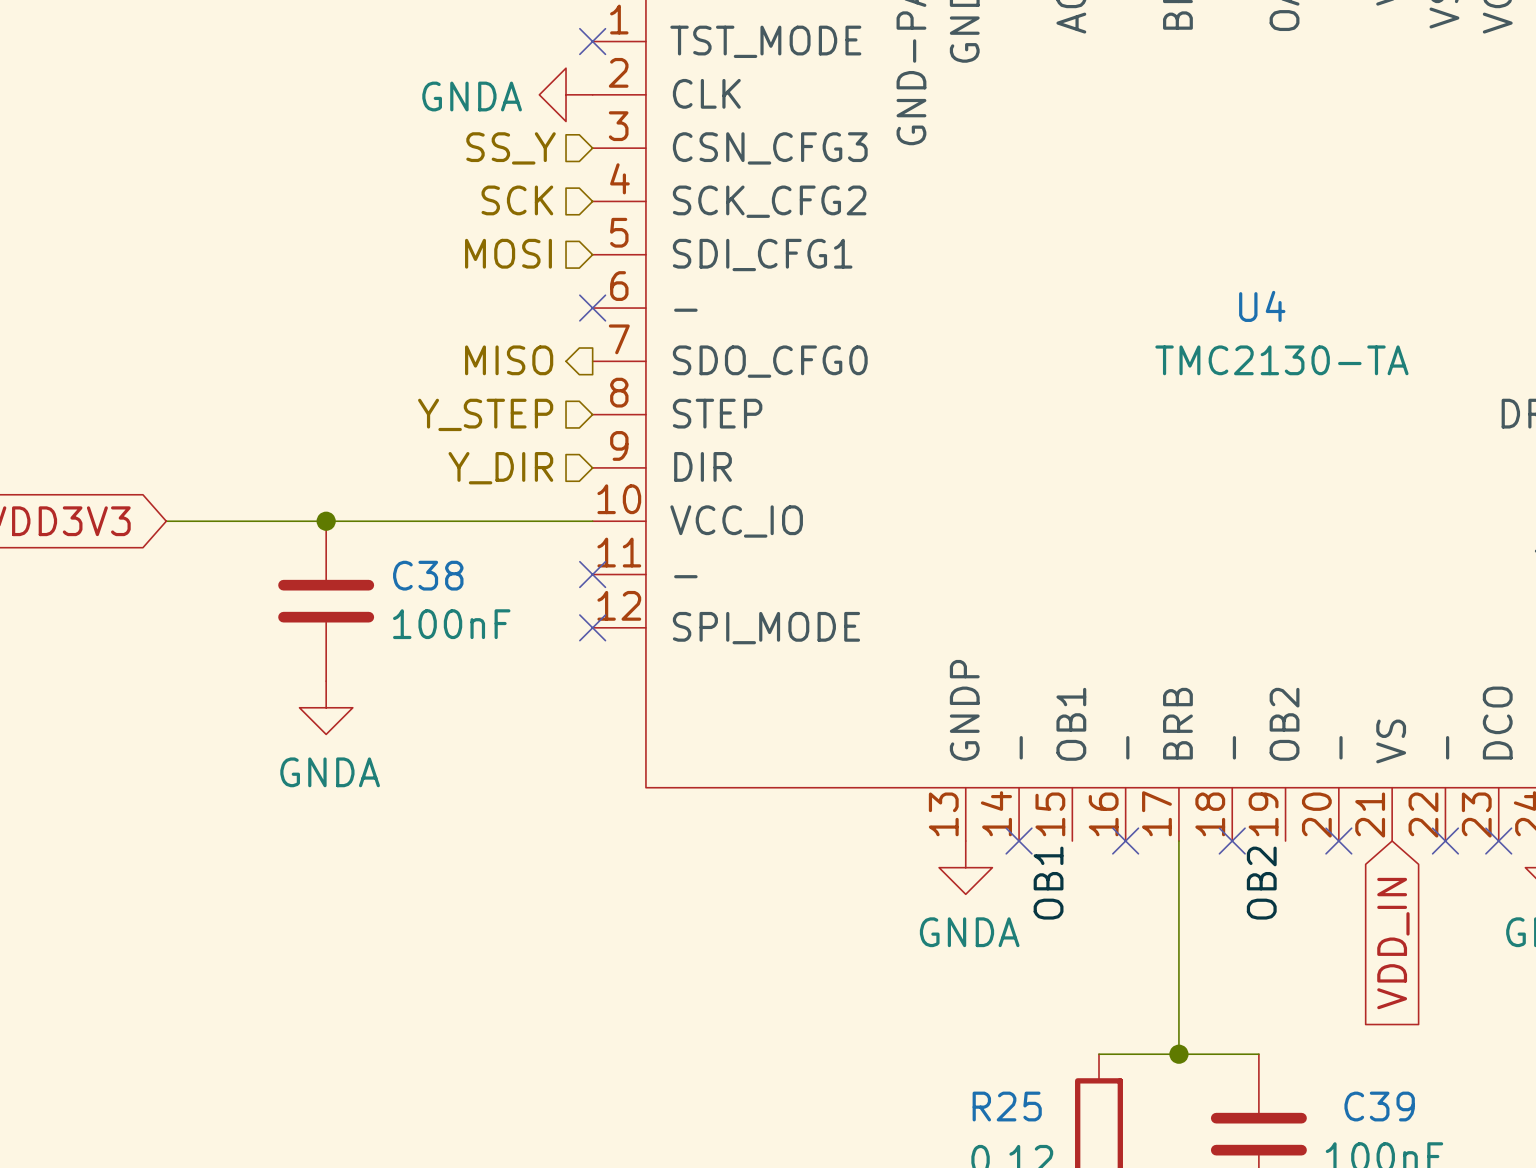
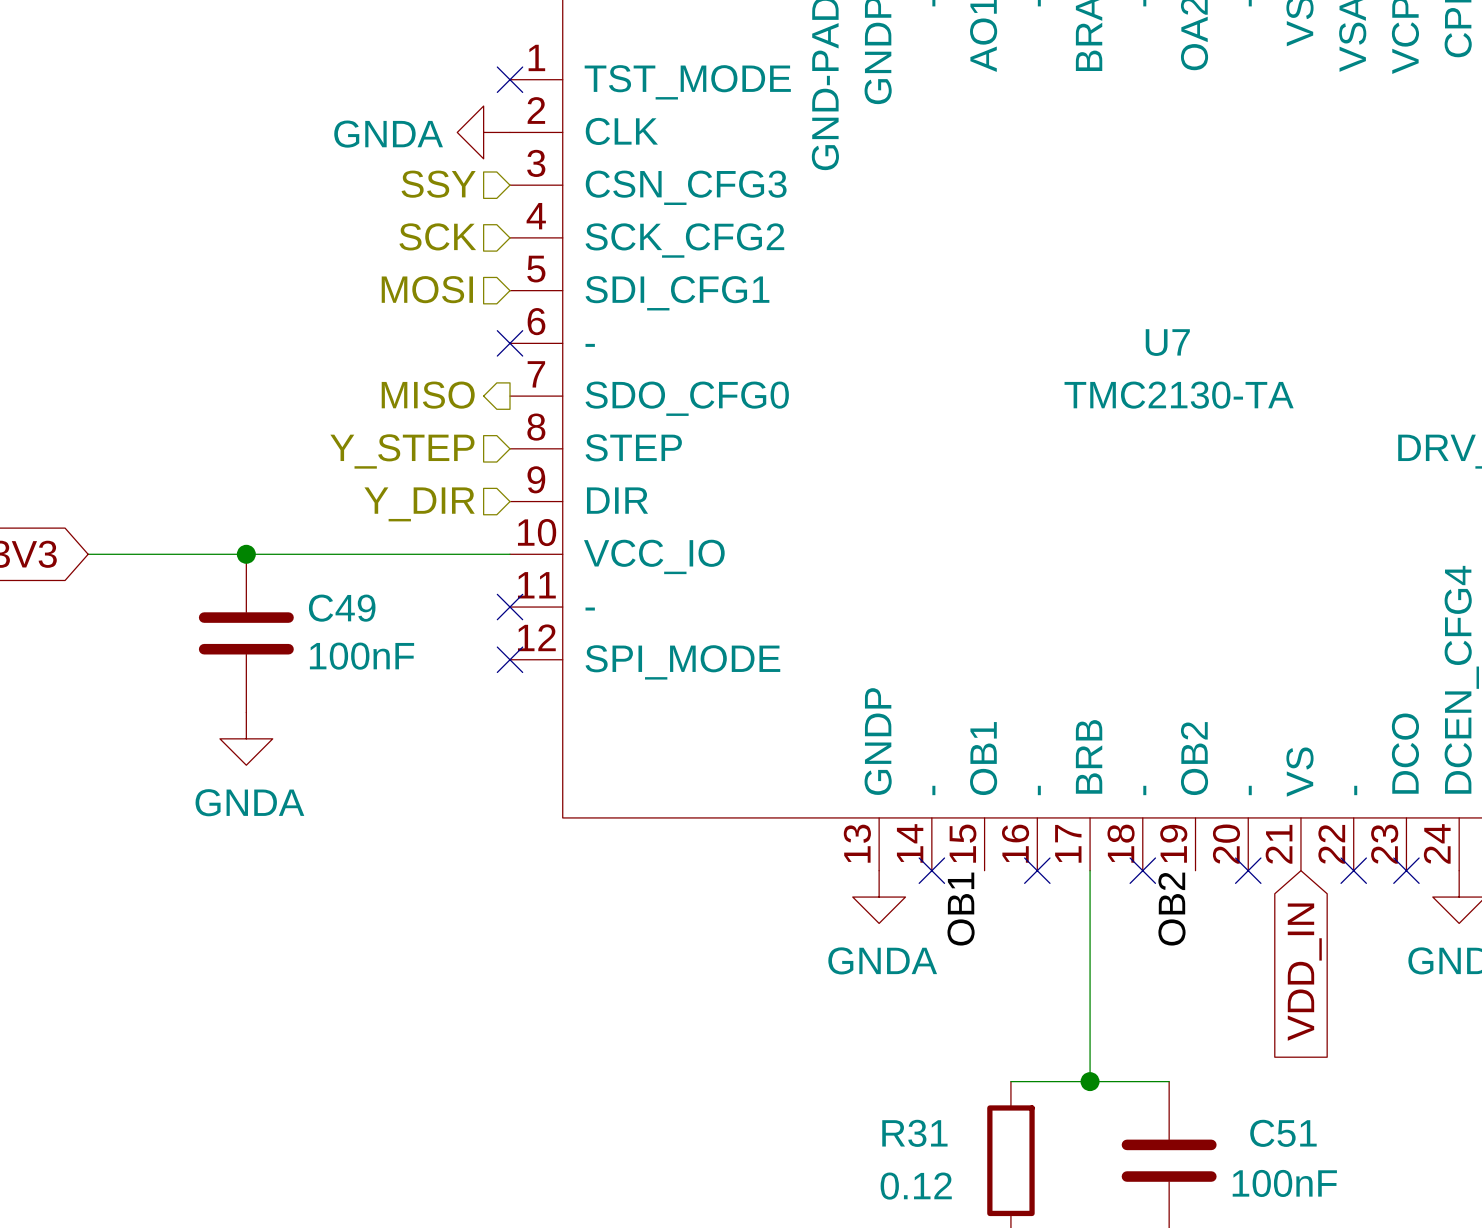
hierarchical label: SS_Y (511, 148) -> SSY (438, 184)
U4 name: U4 (1262, 306) -> U7 (1167, 342)
C38 name: C38 (428, 575) -> C49 (342, 608)
R25 name: R25 (1007, 1106) -> R31 (914, 1133)
C39 name: C39 (1379, 1106) -> C51 (1283, 1133)

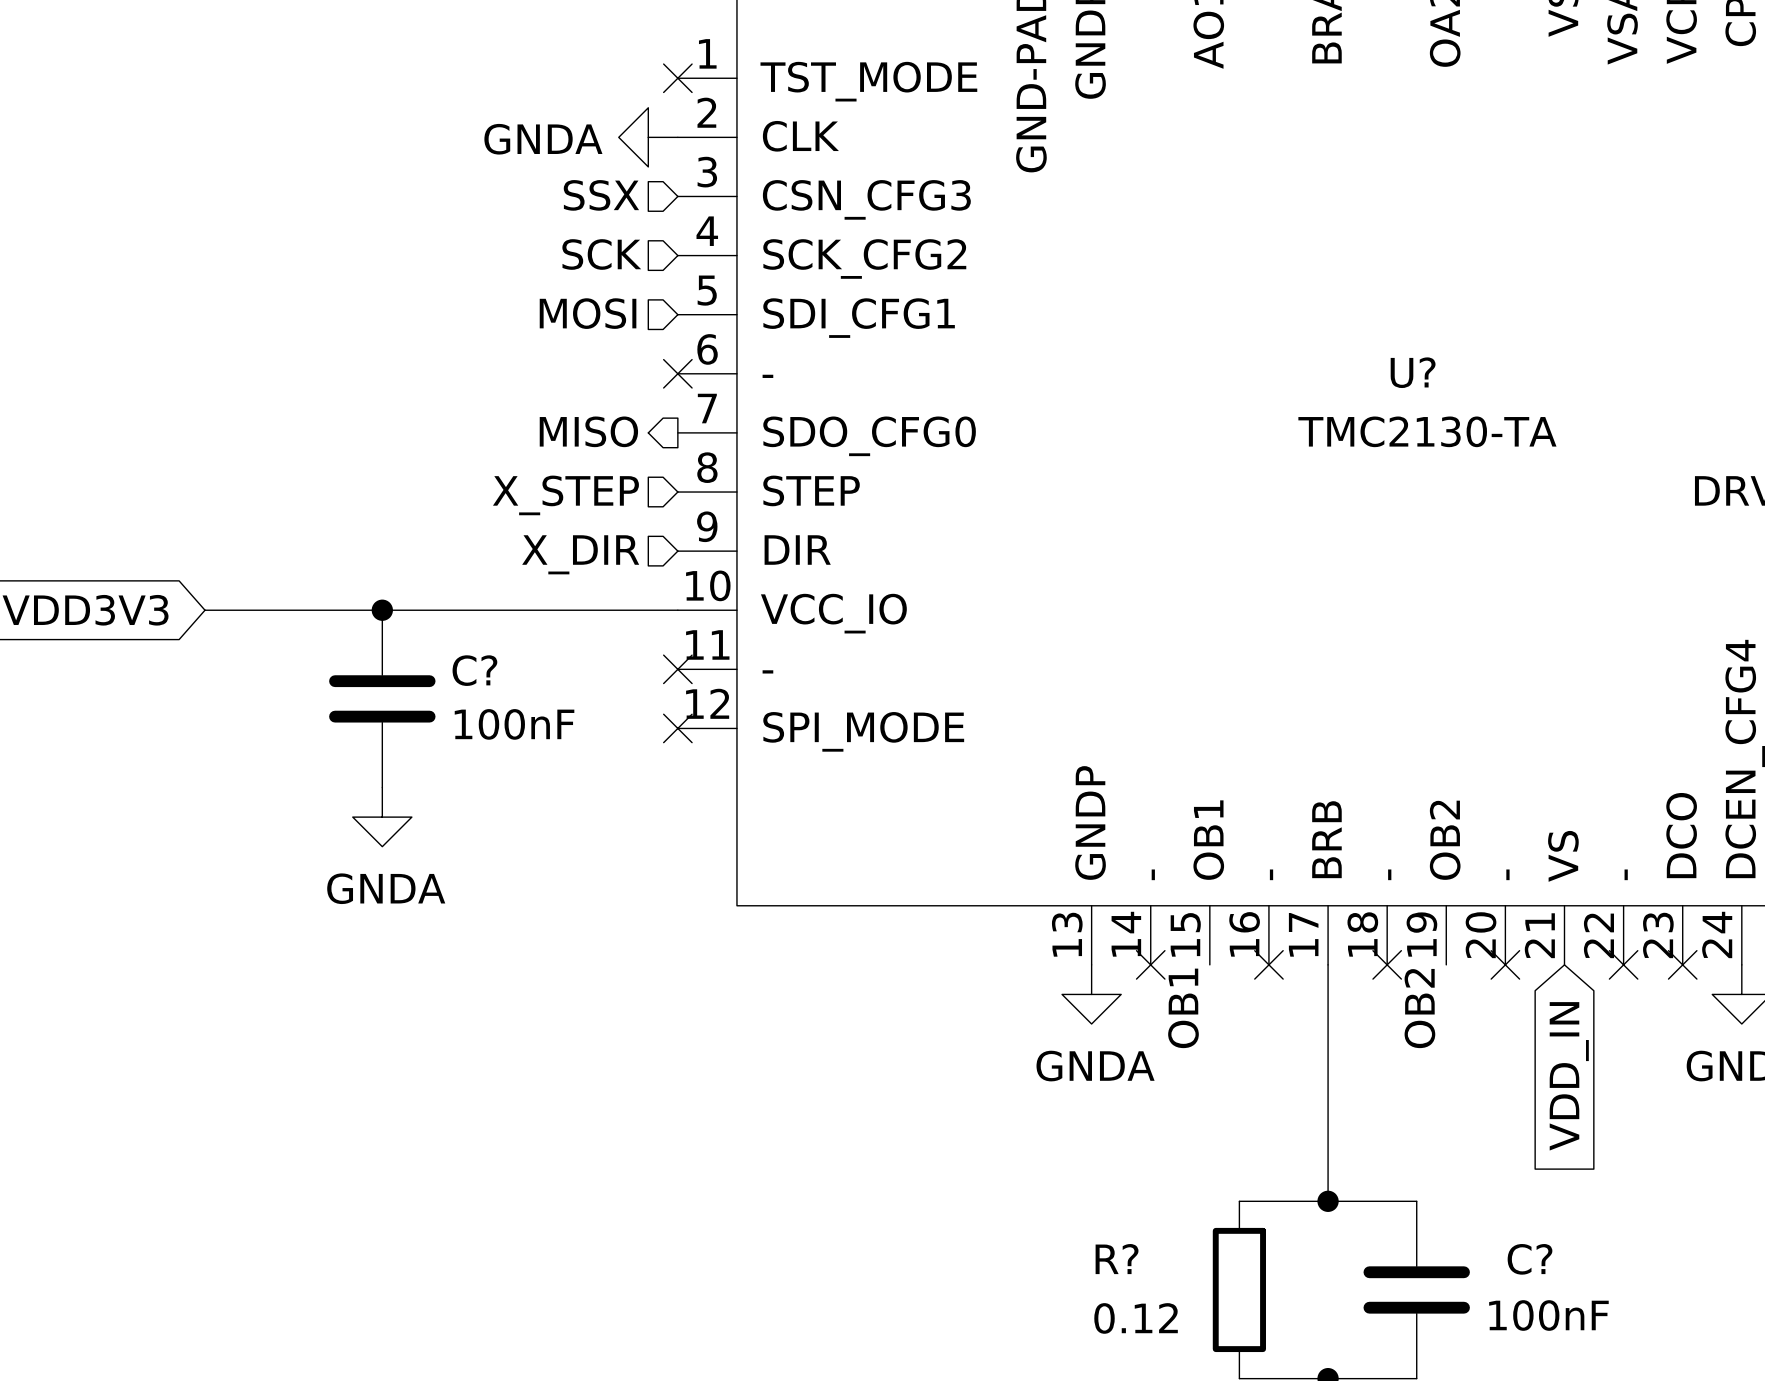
hierarchical label: SSY (438, 184) -> SSX (601, 195)
U7 name: U7 (1167, 342) -> U? (1413, 372)
hierarchical label: Y_STEP (402, 451) -> X_STEP (565, 495)
hierarchical label: Y_DIR (419, 504) -> X_DIR (580, 554)
C49 name: C49 (342, 608) -> C? (474, 670)
R31 name: R31 (914, 1133) -> R? (1117, 1259)
C51 name: C51 (1283, 1133) -> C? (1530, 1259)

